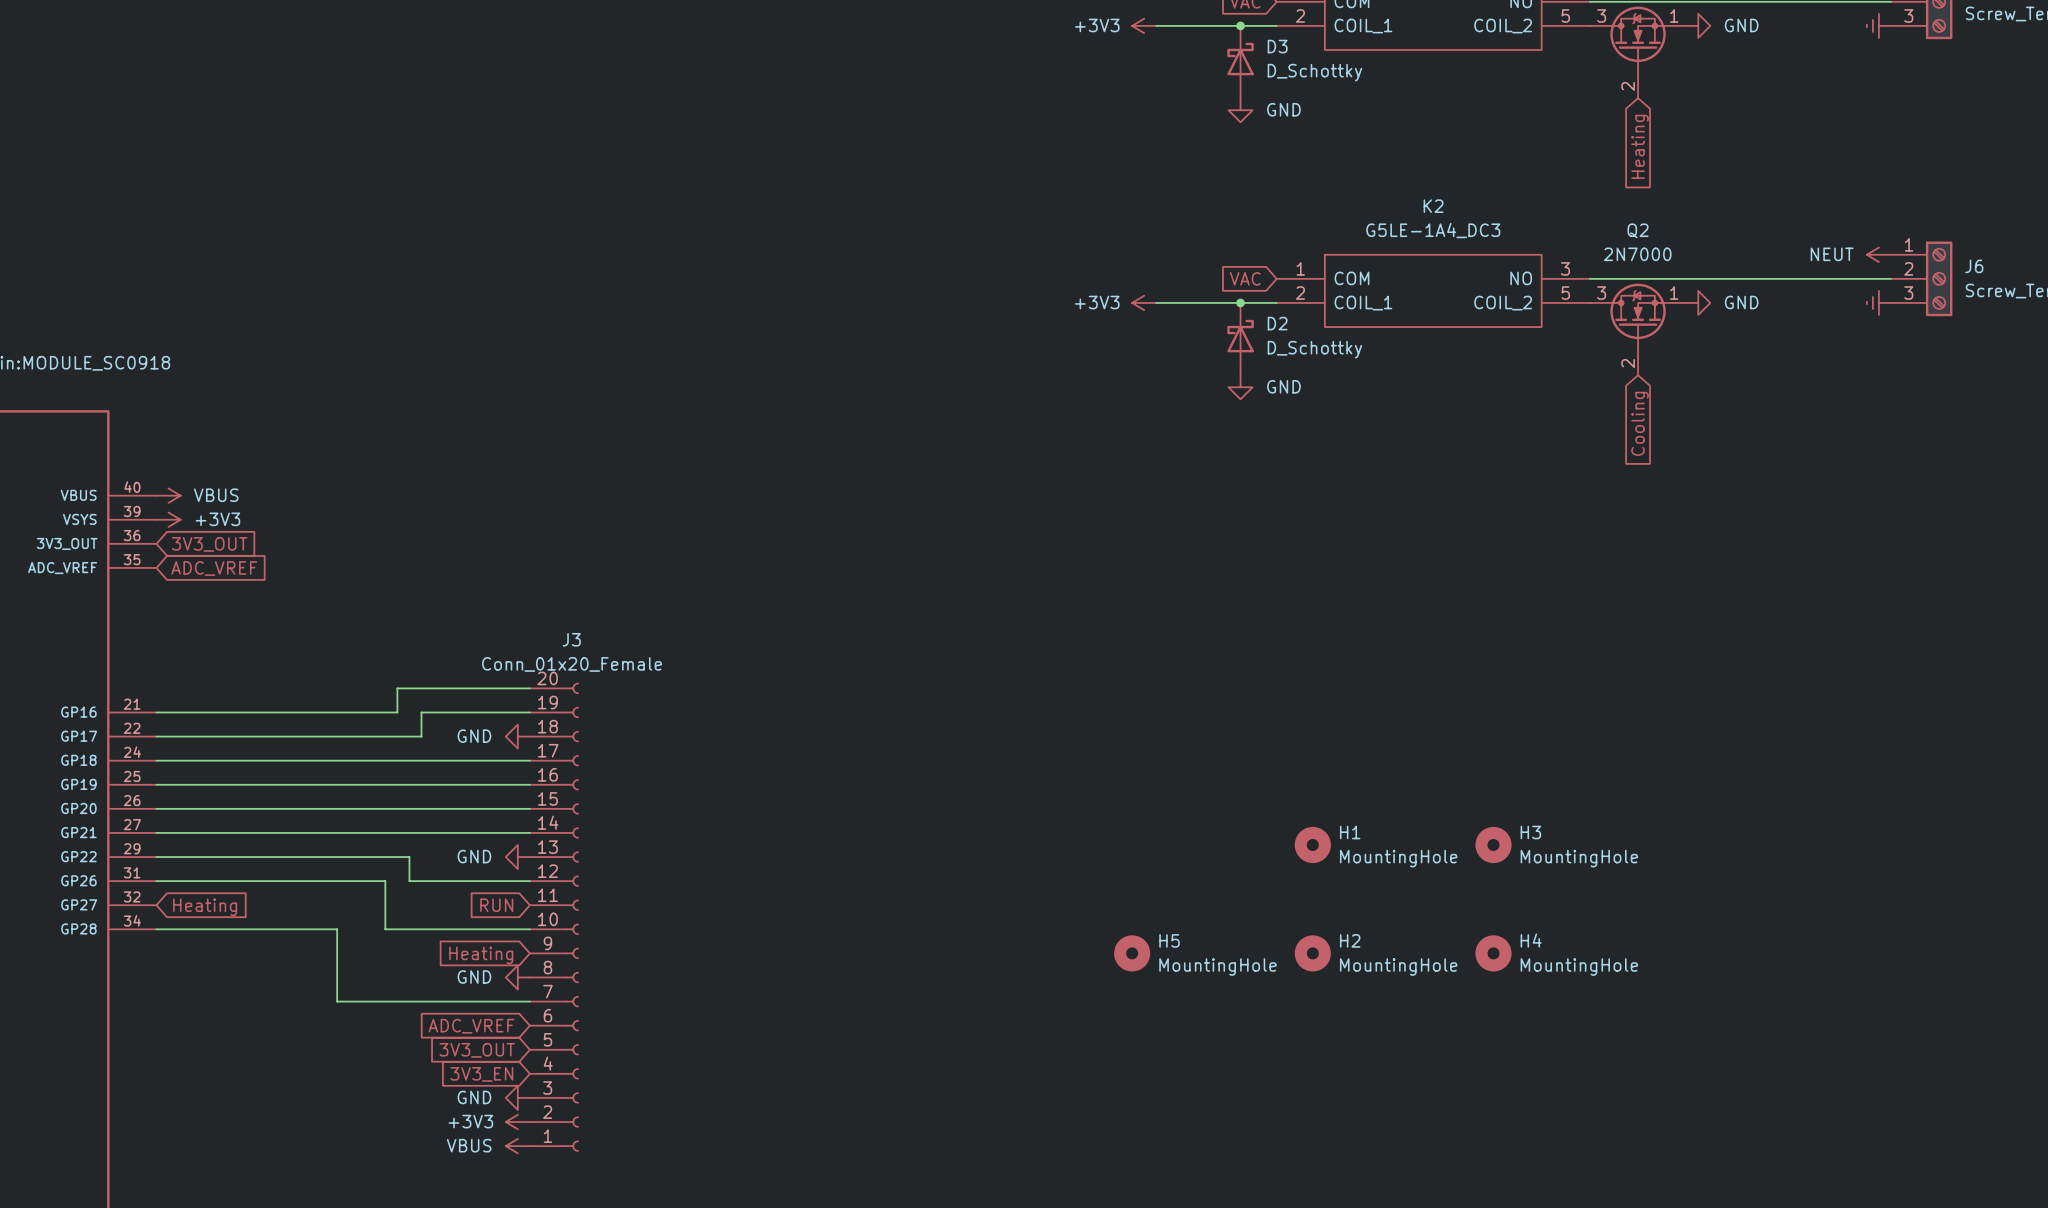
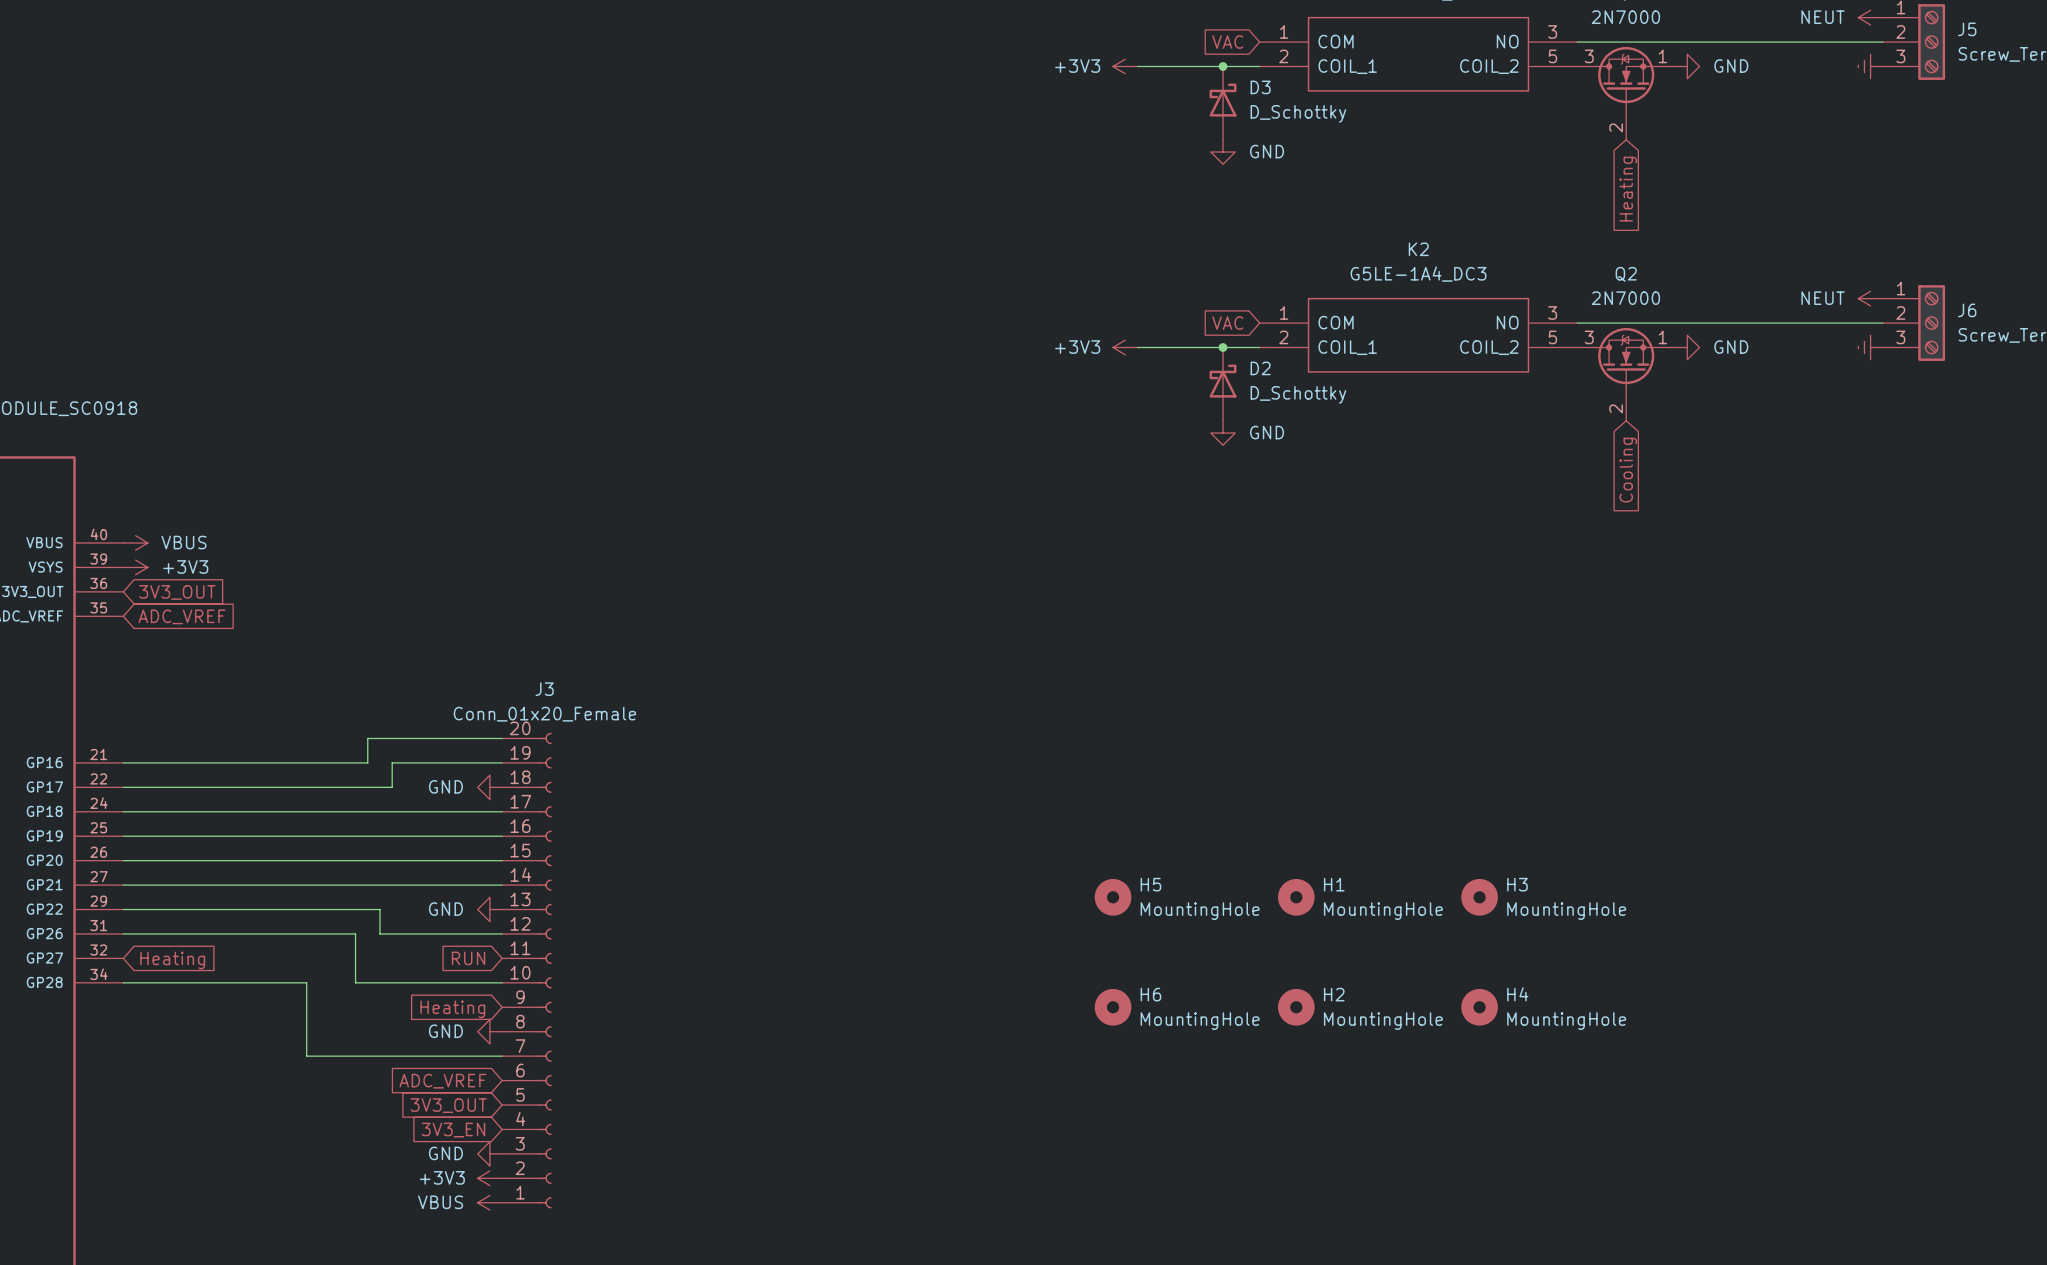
H5: none -> MountingHole (1113, 897)
H5 name: H5 (1169, 940) -> H6 (1150, 994)

